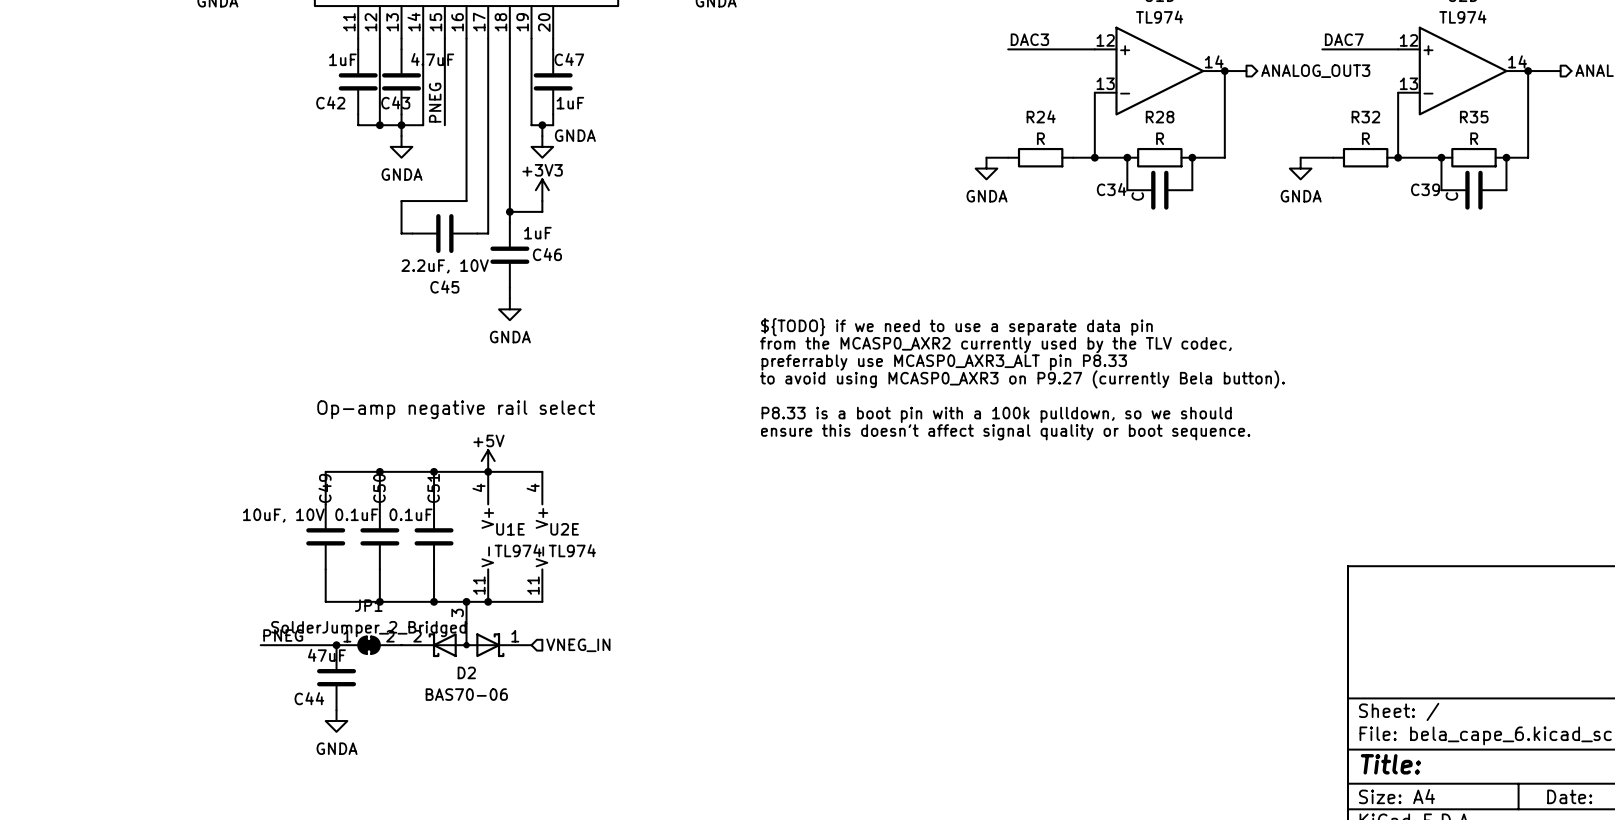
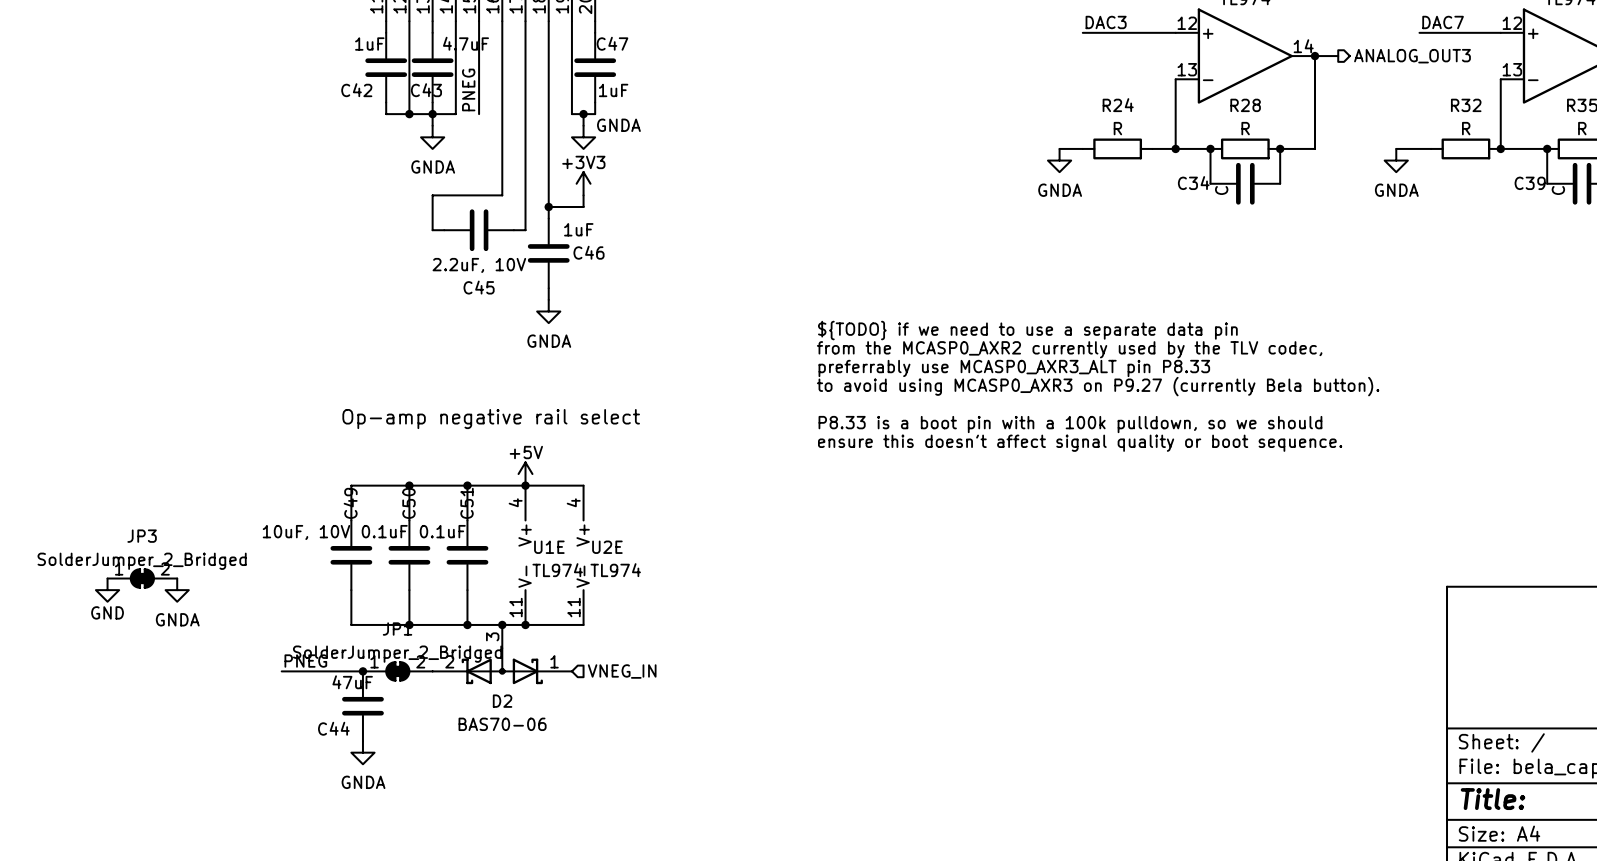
JP3: none -> SolderJumper_2_Bridged (142, 578)
power symbol: none -> GND (107, 590)
power symbol: none -> GNDA (177, 590)

